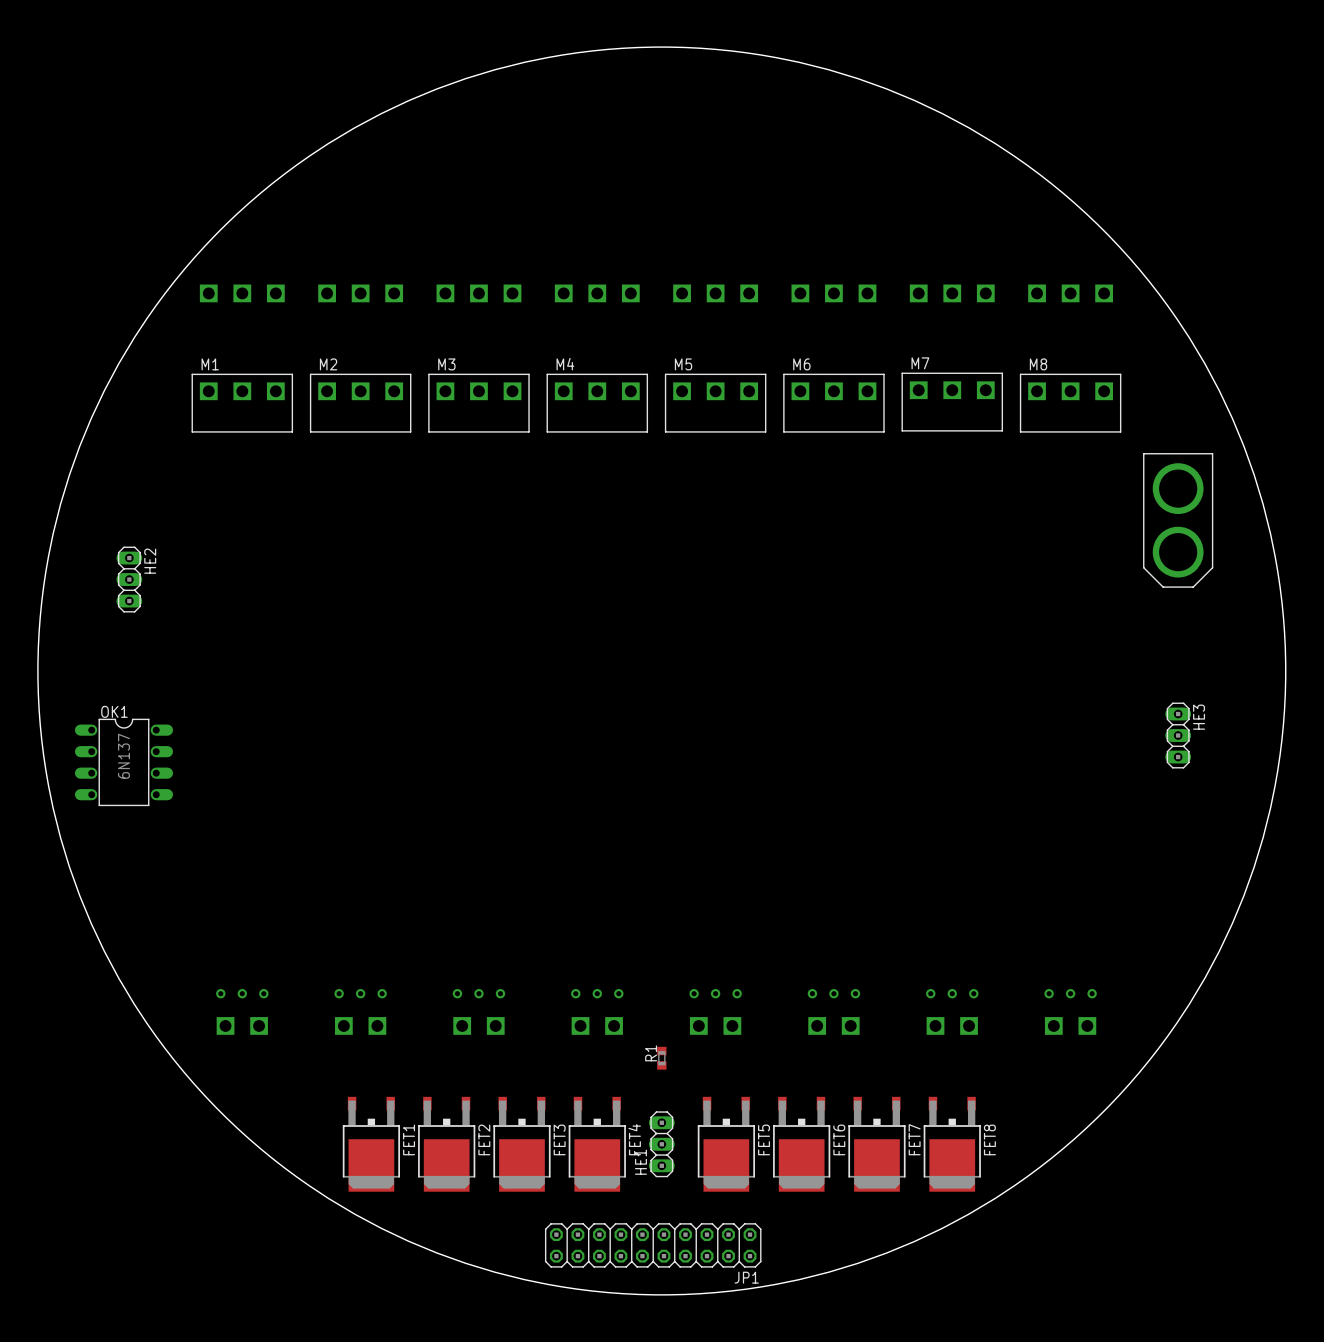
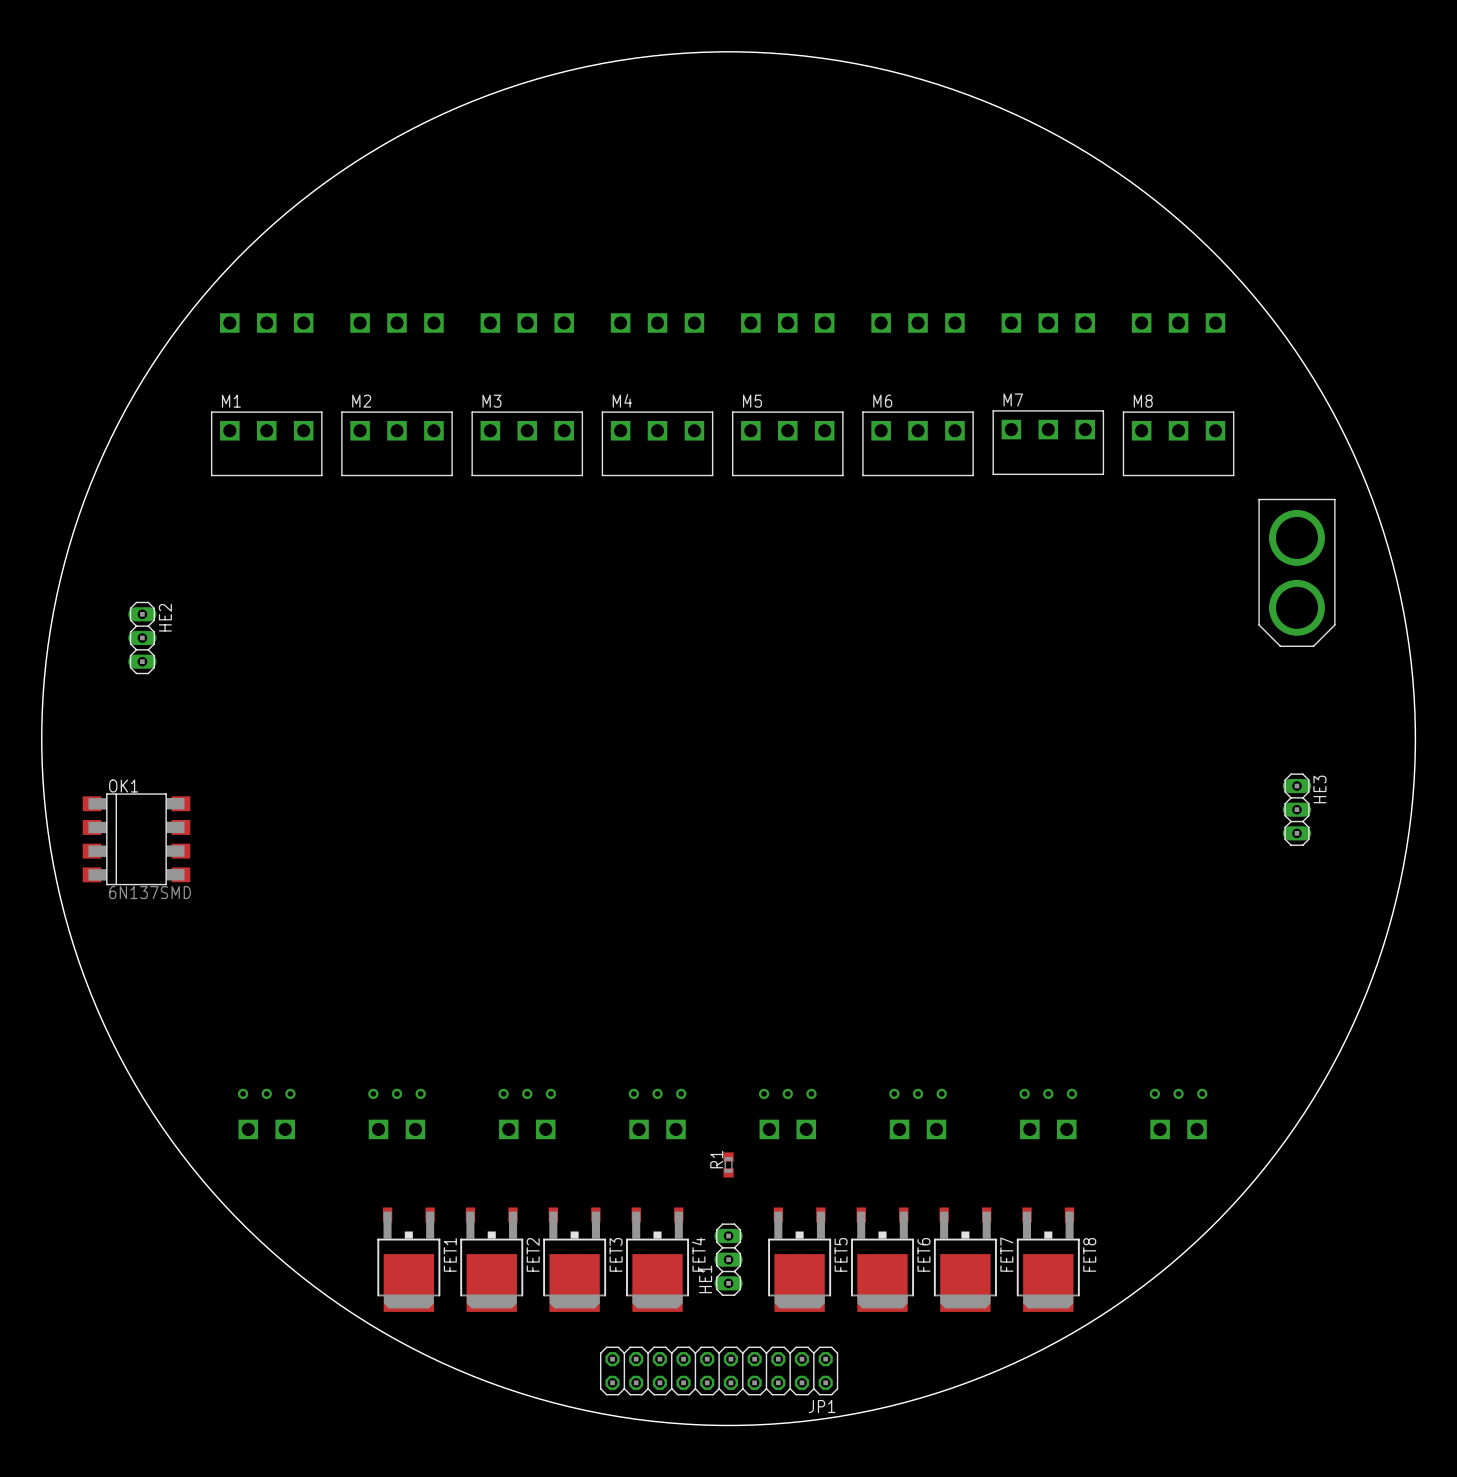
OK1 footprint: [74, 718, 174, 807] -> [82, 793, 191, 886]
OK1 value: 6N137 (123, 756) -> 6N137SMD (150, 892)

